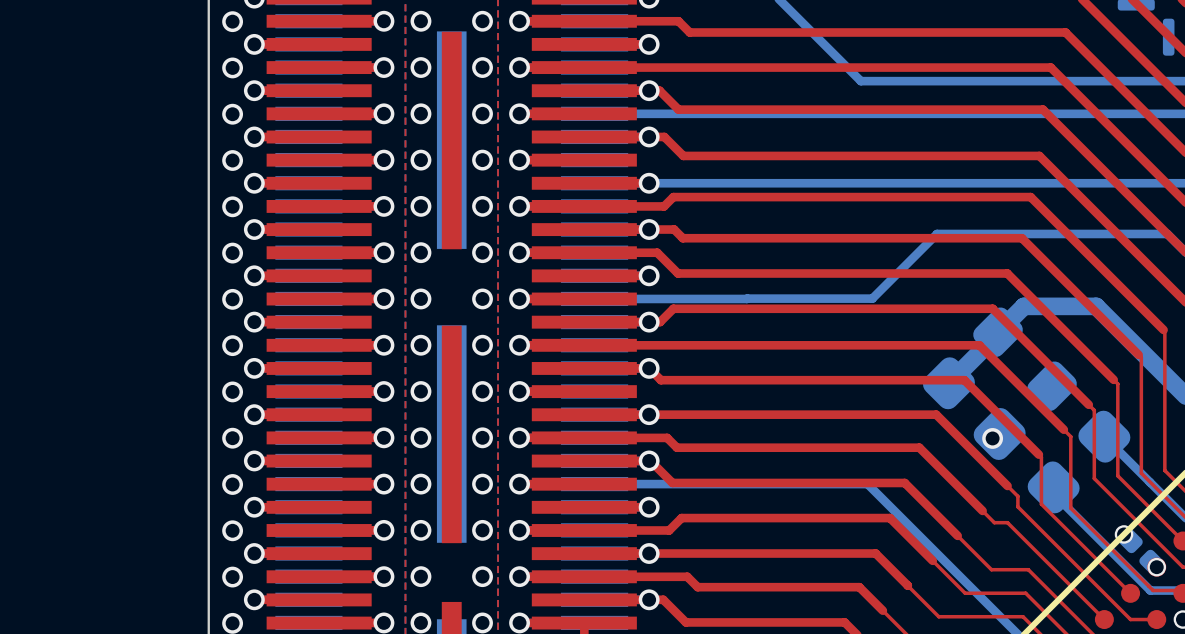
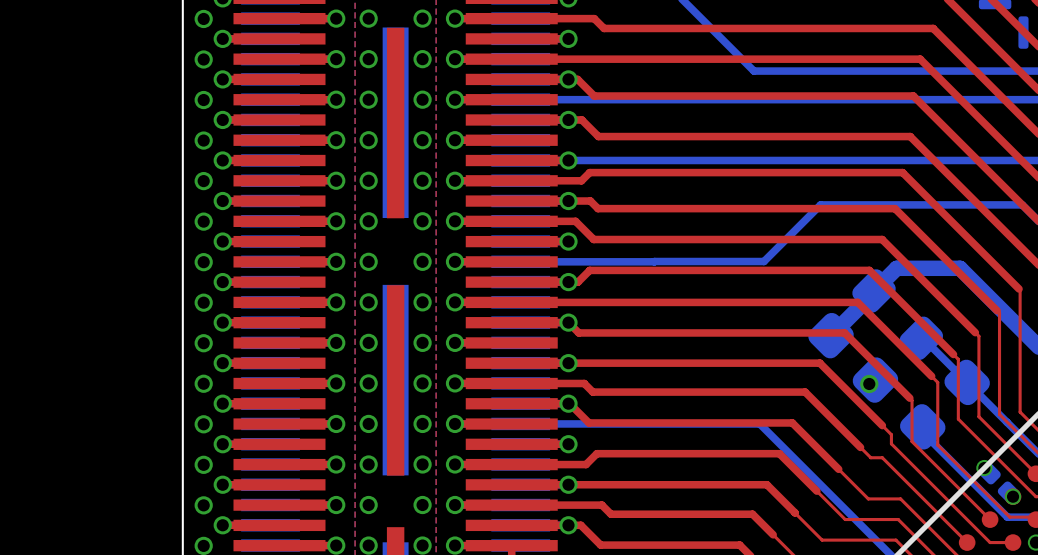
bottom track: none -> (921, 338) (967, 382)

